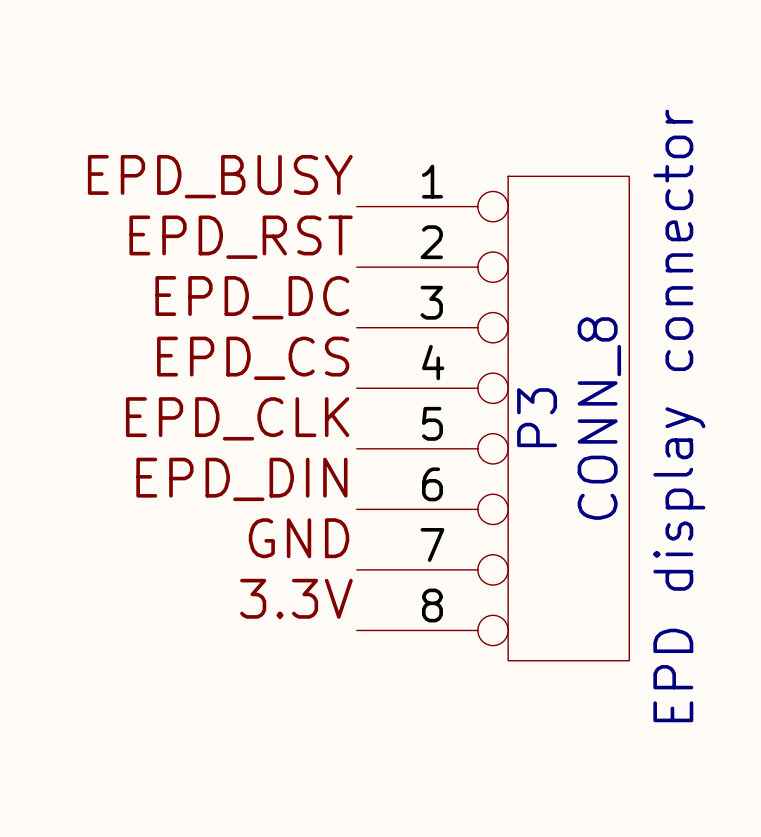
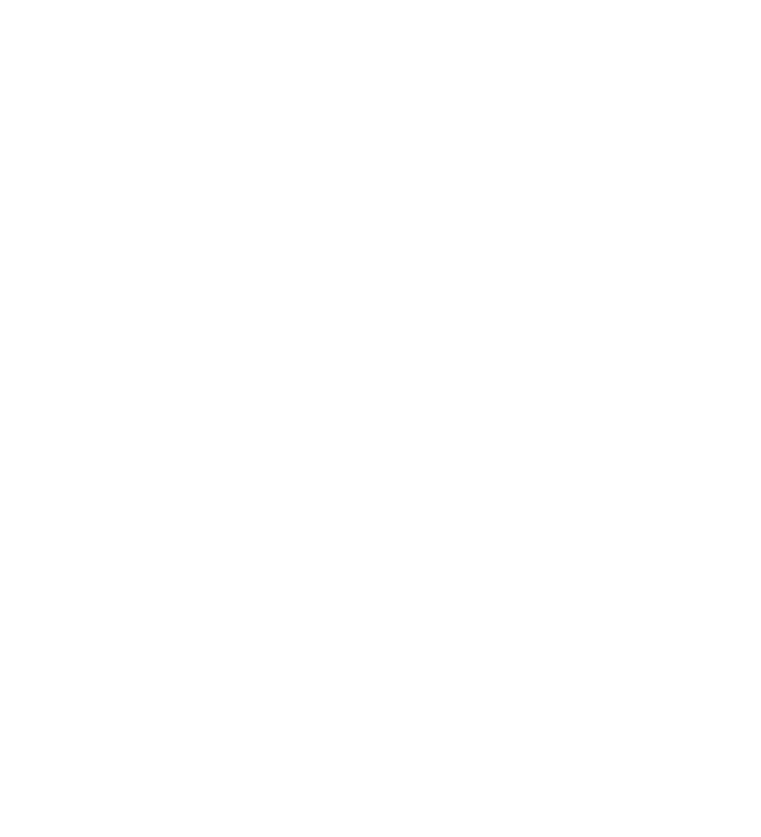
label: EPD_BUSY (220, 176) -> none
label: EPD_RST (241, 237) -> none
label: EPD_DC (252, 297) -> none
label: EPD_CS (253, 358) -> none
label: EPD_CLK (237, 418) -> none
P3: CONN_8 (493, 418) -> none
label: EPD_DIN (241, 479) -> none
label: GND (299, 538) -> none
label: 3.3V (296, 598) -> none

